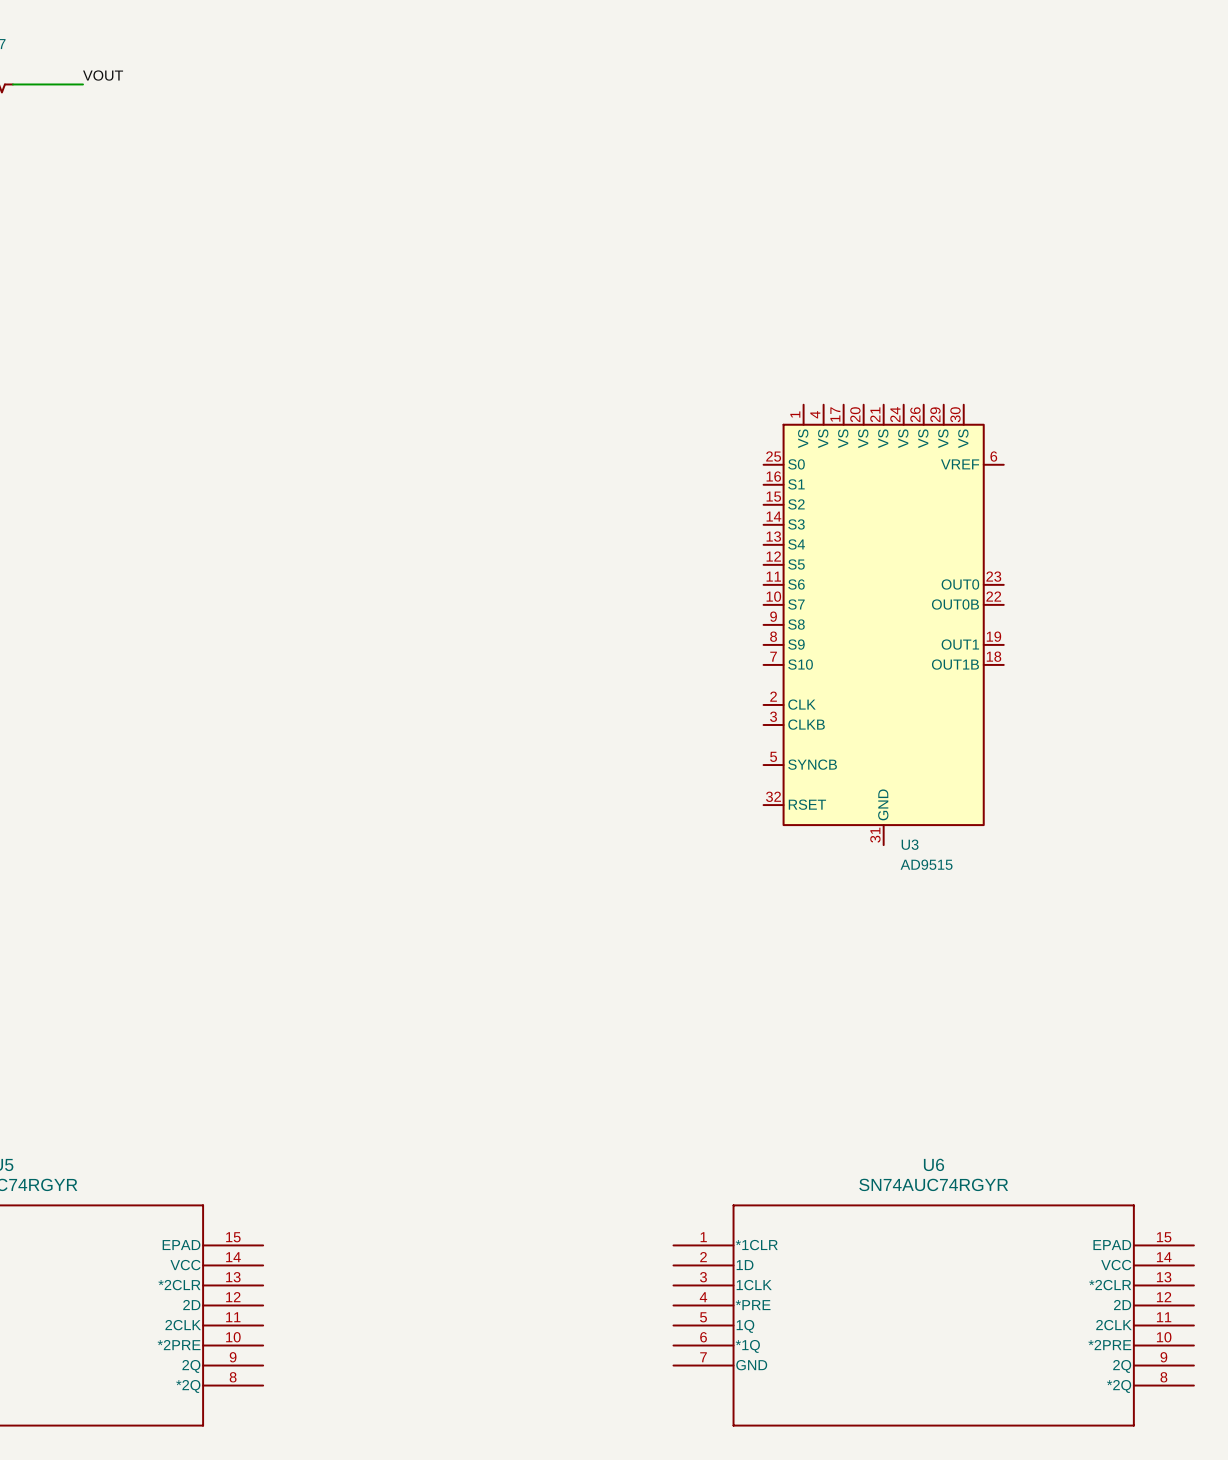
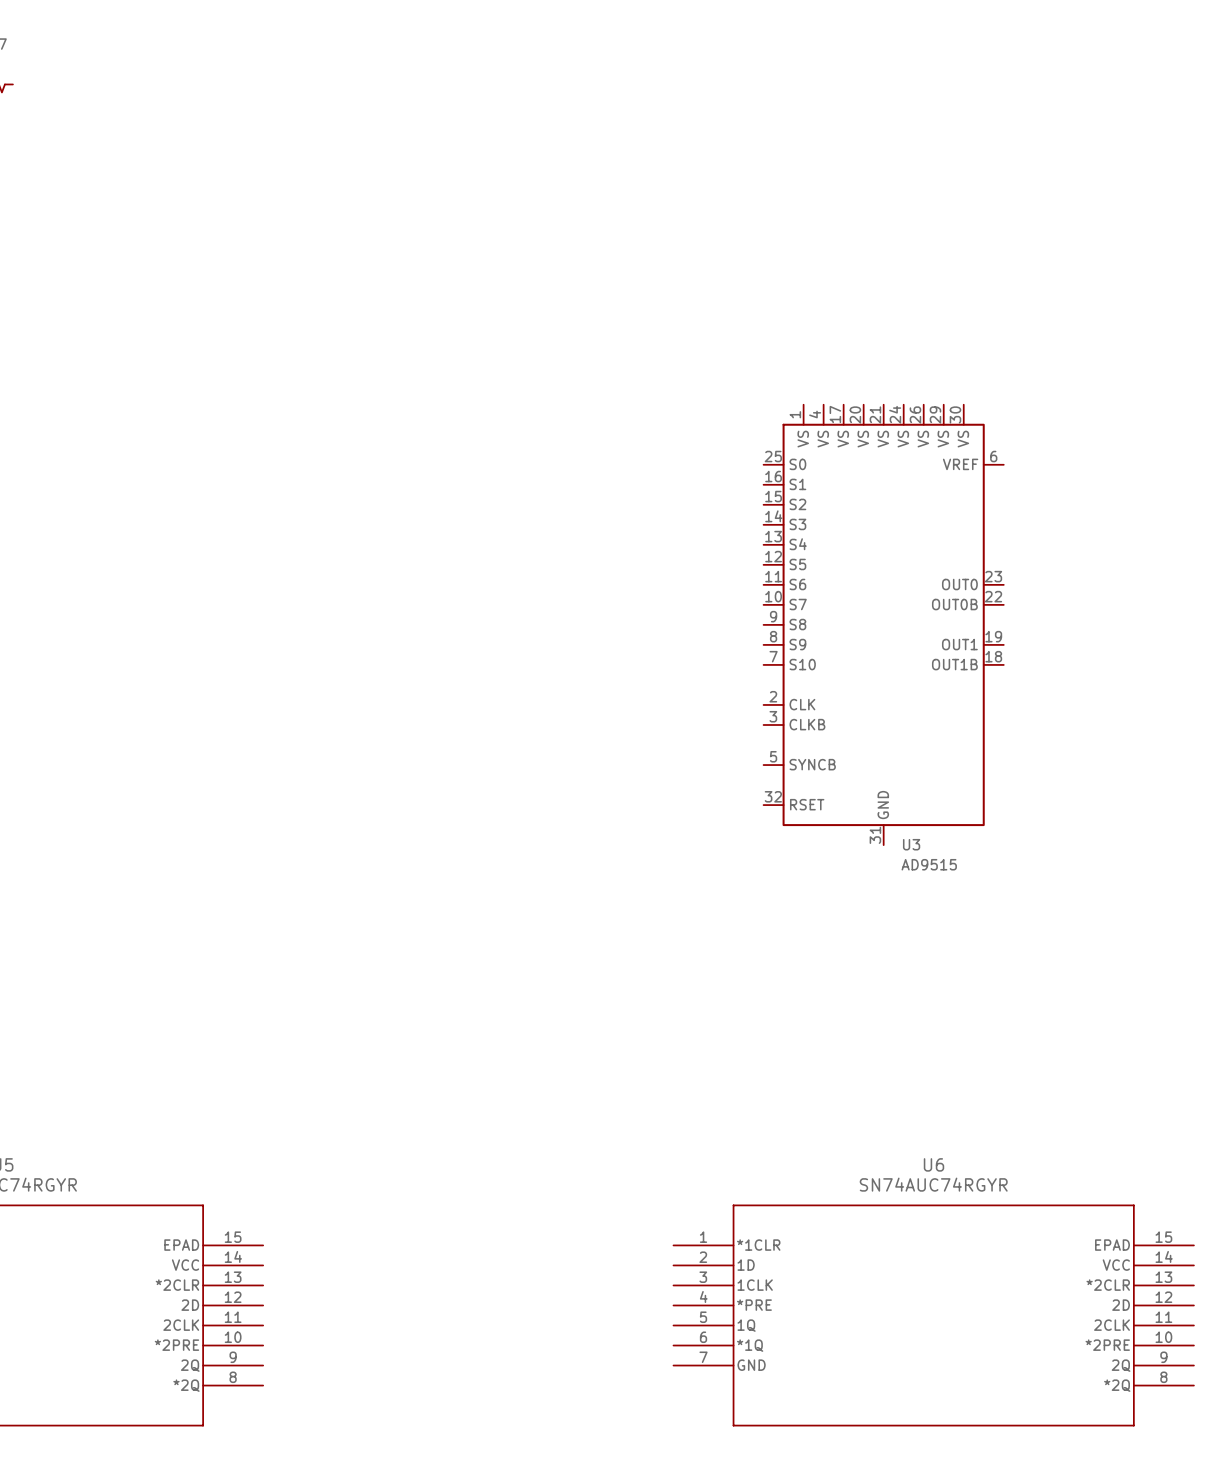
label: VOUT (103, 75) -> none
wire: (12, 84) (83, 84) -> none

